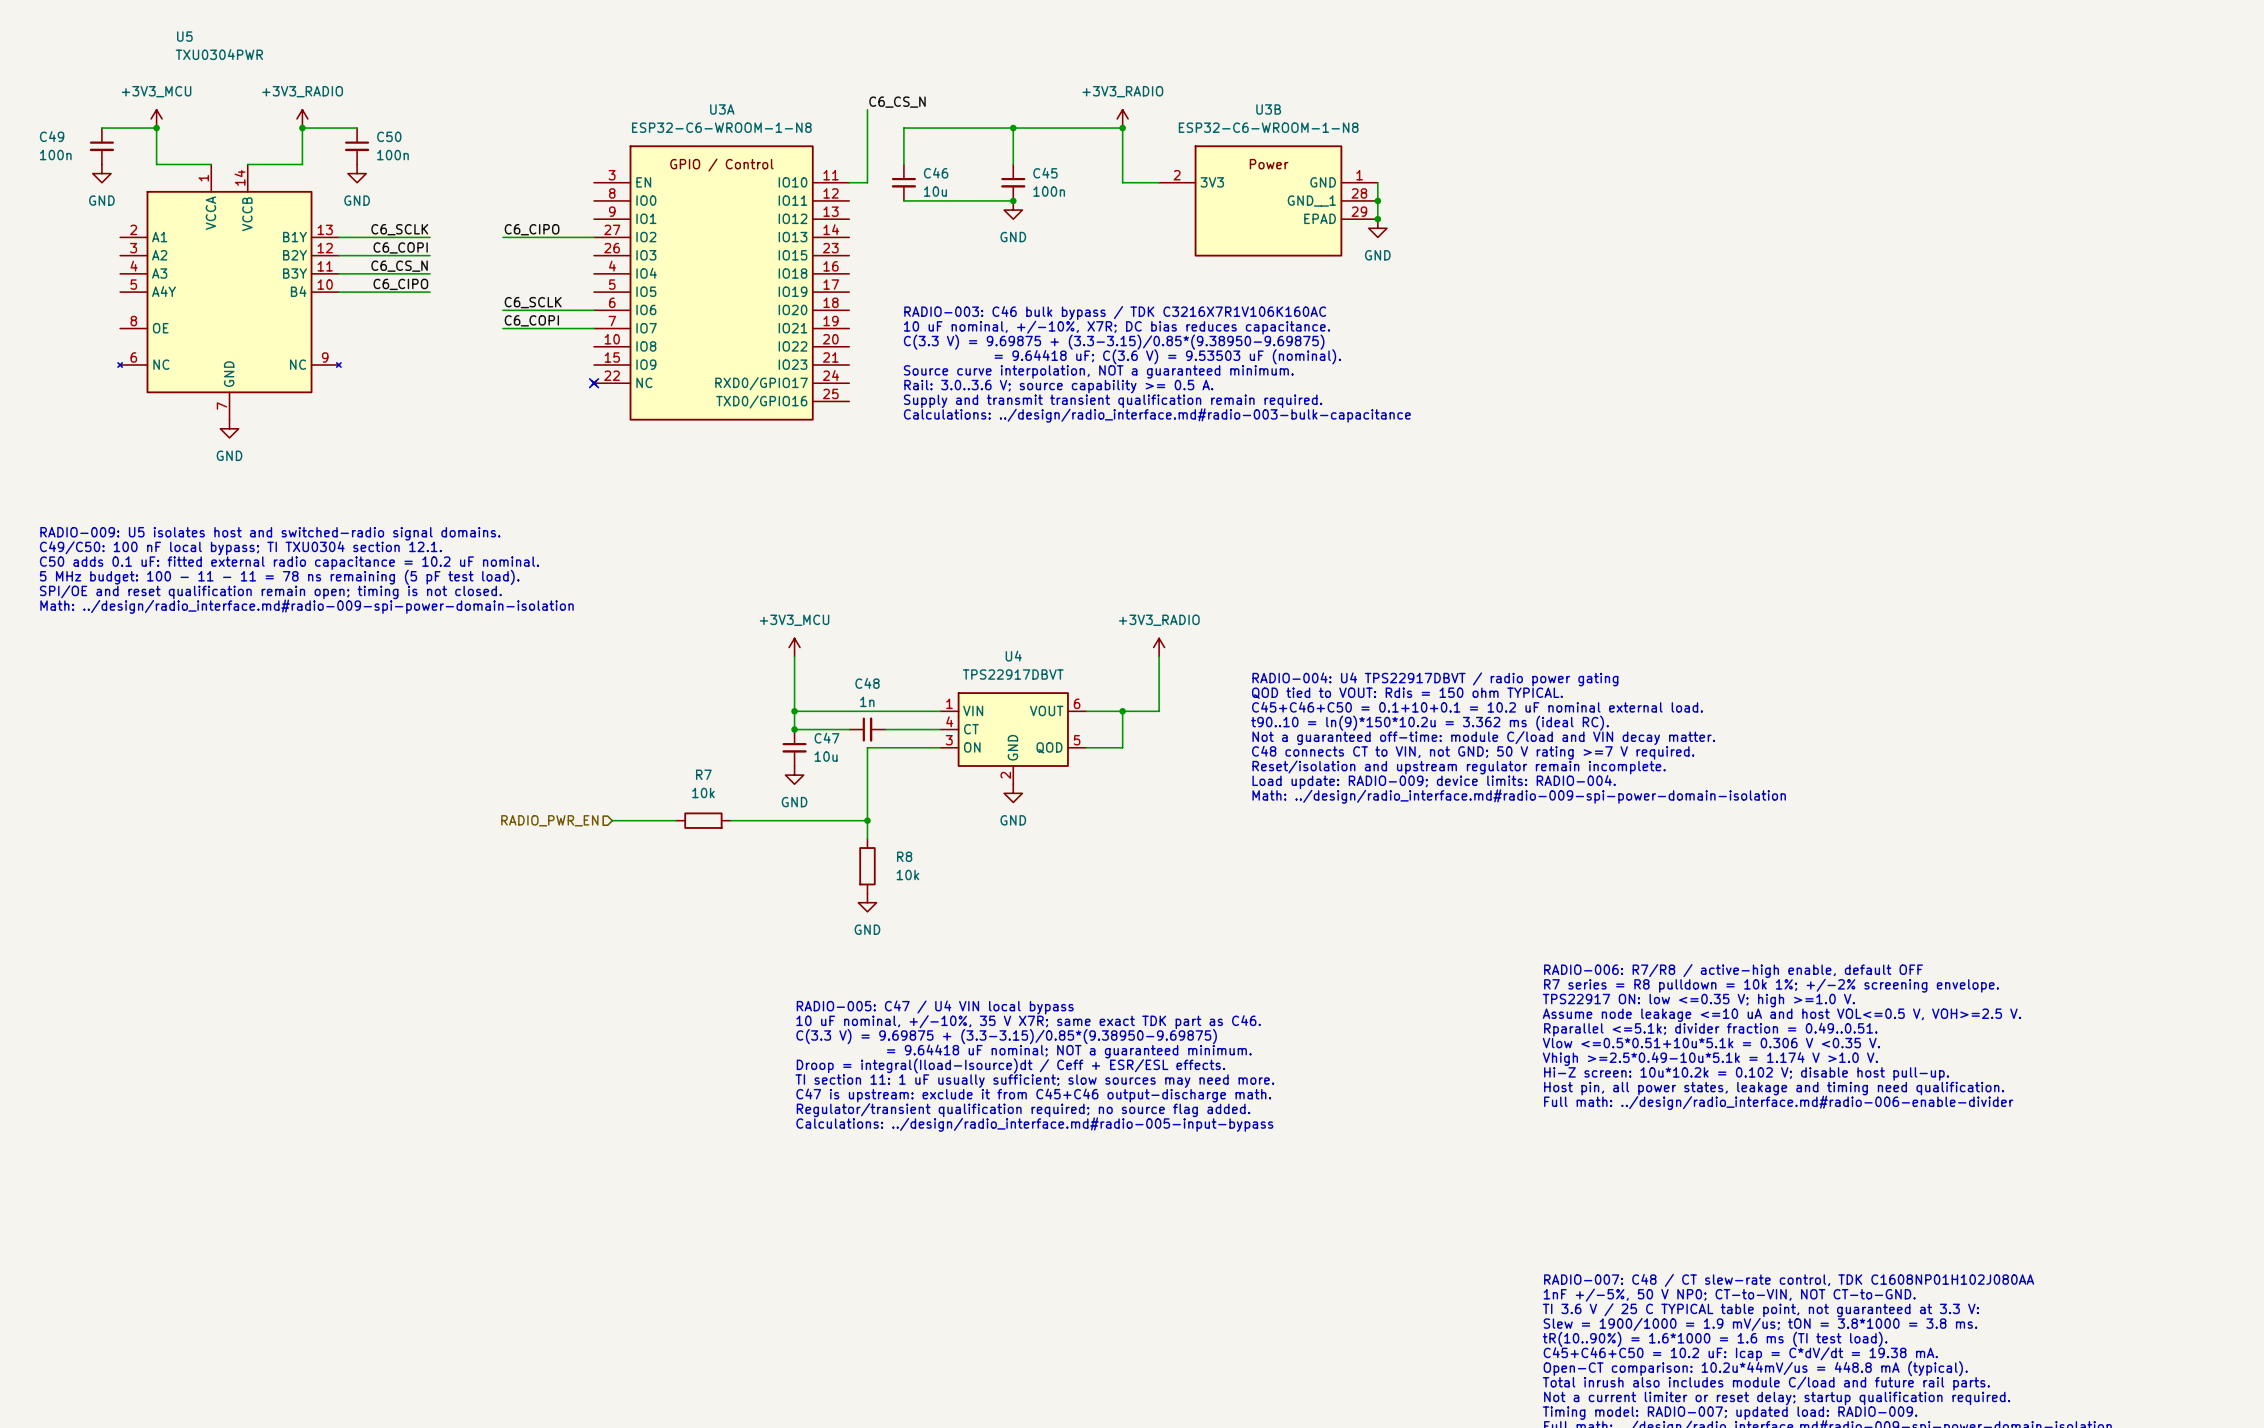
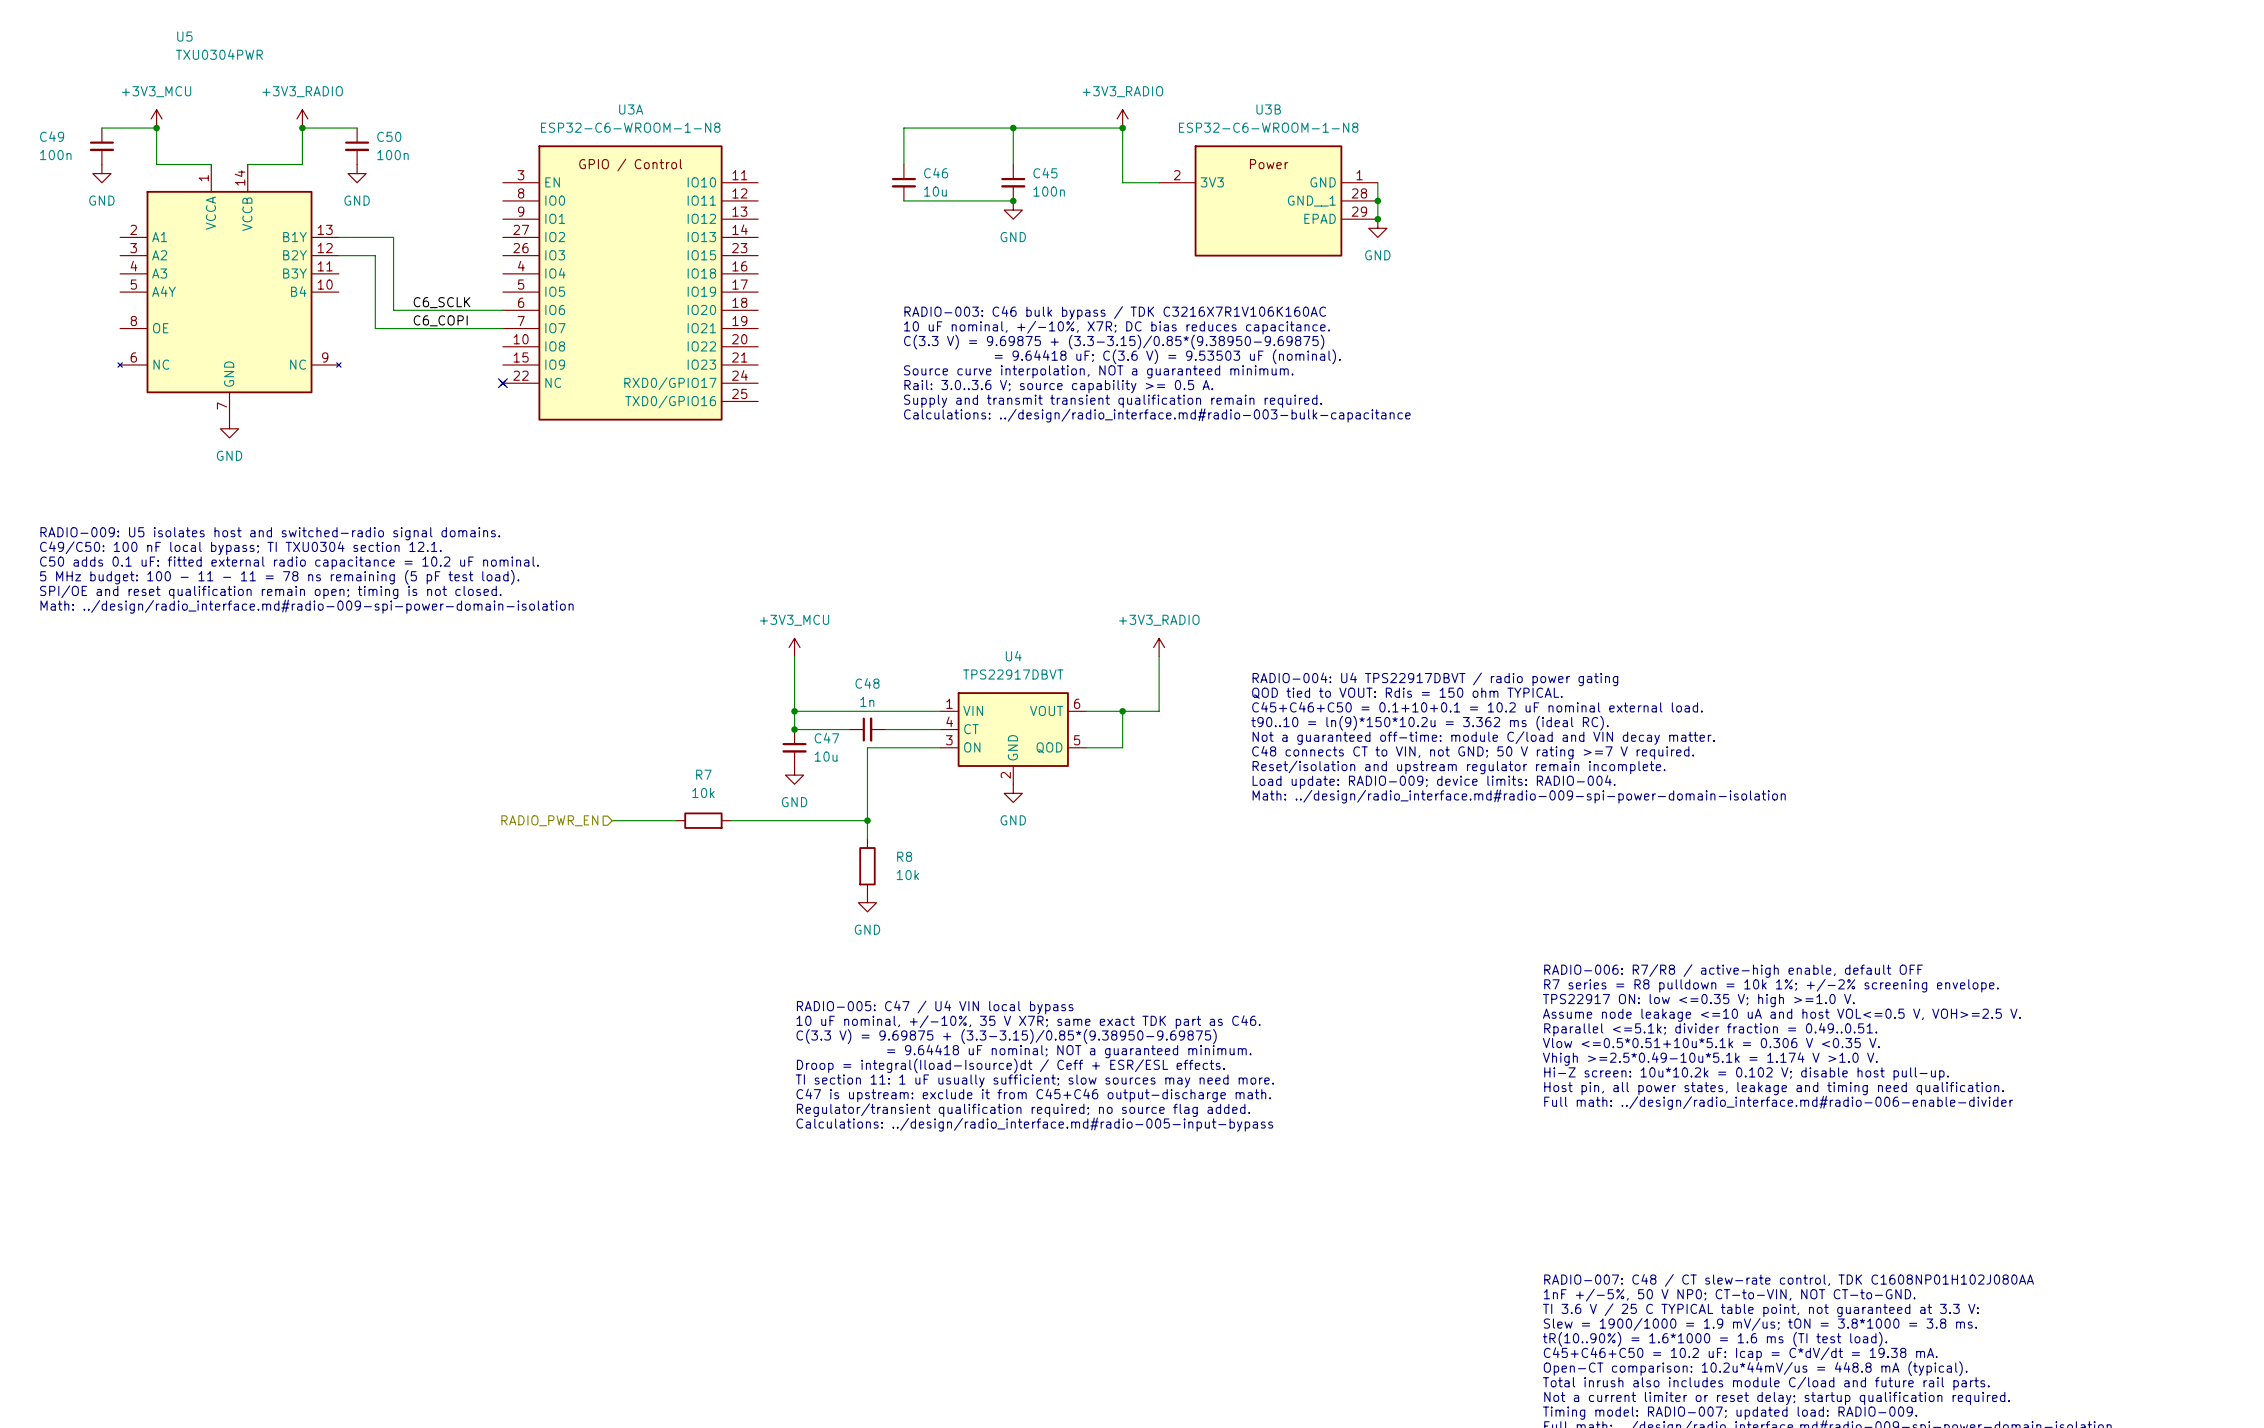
label: C6_CS_N (897, 102) -> none
wire: (867, 109) (867, 182) (849, 182) -> none
label: C6_SCLK (399, 229) -> none
label: C6_CIPO (532, 229) -> none
wire: (393, 237) (430, 237) -> (393, 237) (393, 310) (502, 310)
label: C6_COPI (400, 247) -> none
wire: (375, 255) (430, 255) -> (375, 255) (375, 328) (502, 328)
label: C6_CS_N (399, 266) -> none
wire: (338, 273) (430, 273) -> none
U3A position: (720, 282) -> (629, 282)
label: C6_CIPO (400, 284) -> none
wire: (338, 292) (430, 292) -> none
label: none -> C6_SCLK (442, 302)
label: C6_SCLK (533, 302) -> none
label: none -> C6_COPI (440, 320)
label: C6_COPI (531, 320) -> none
no-connect mark: none -> (502, 383)
no-connect mark: (594, 383) -> none

